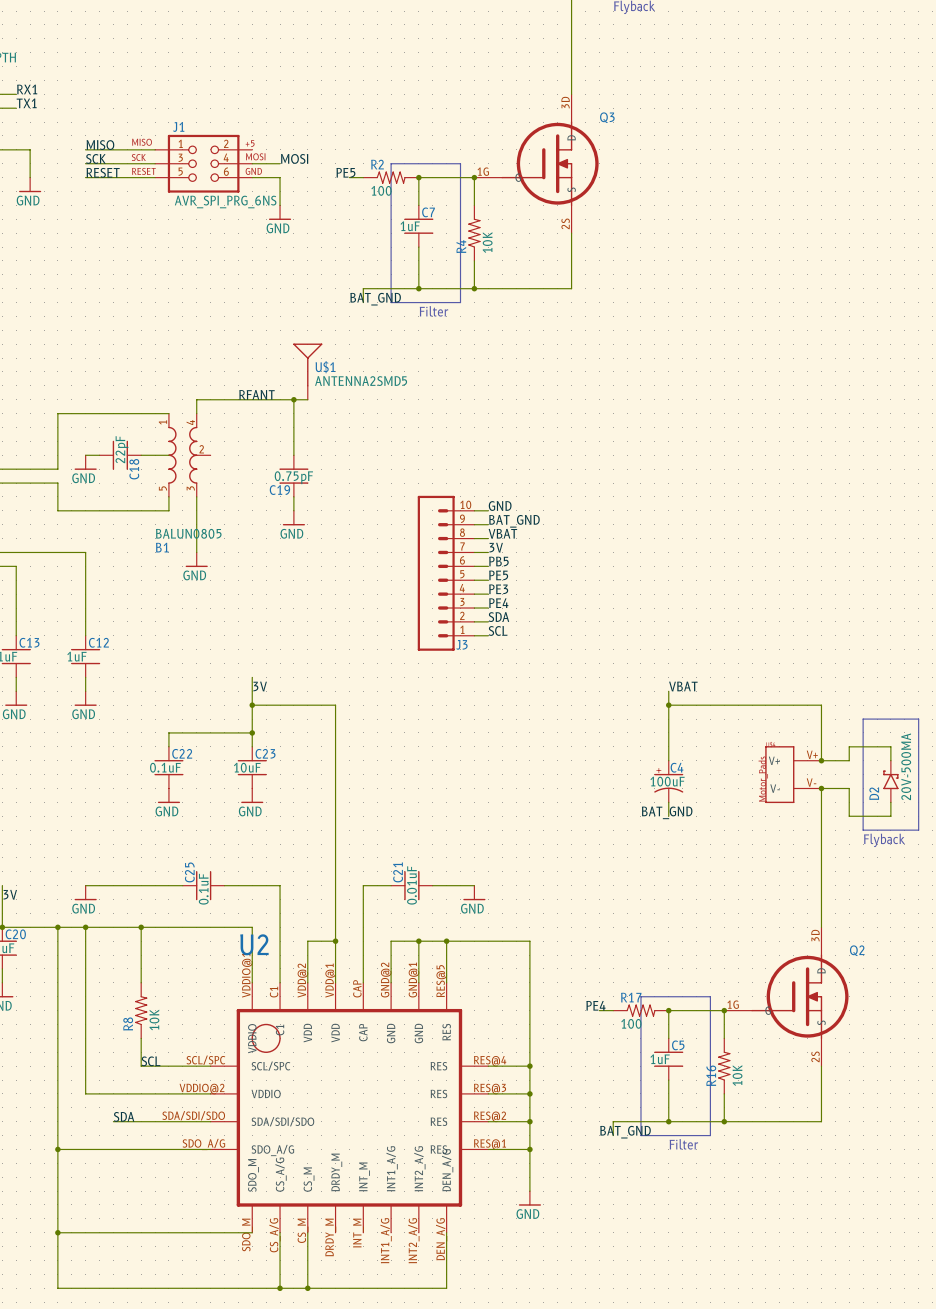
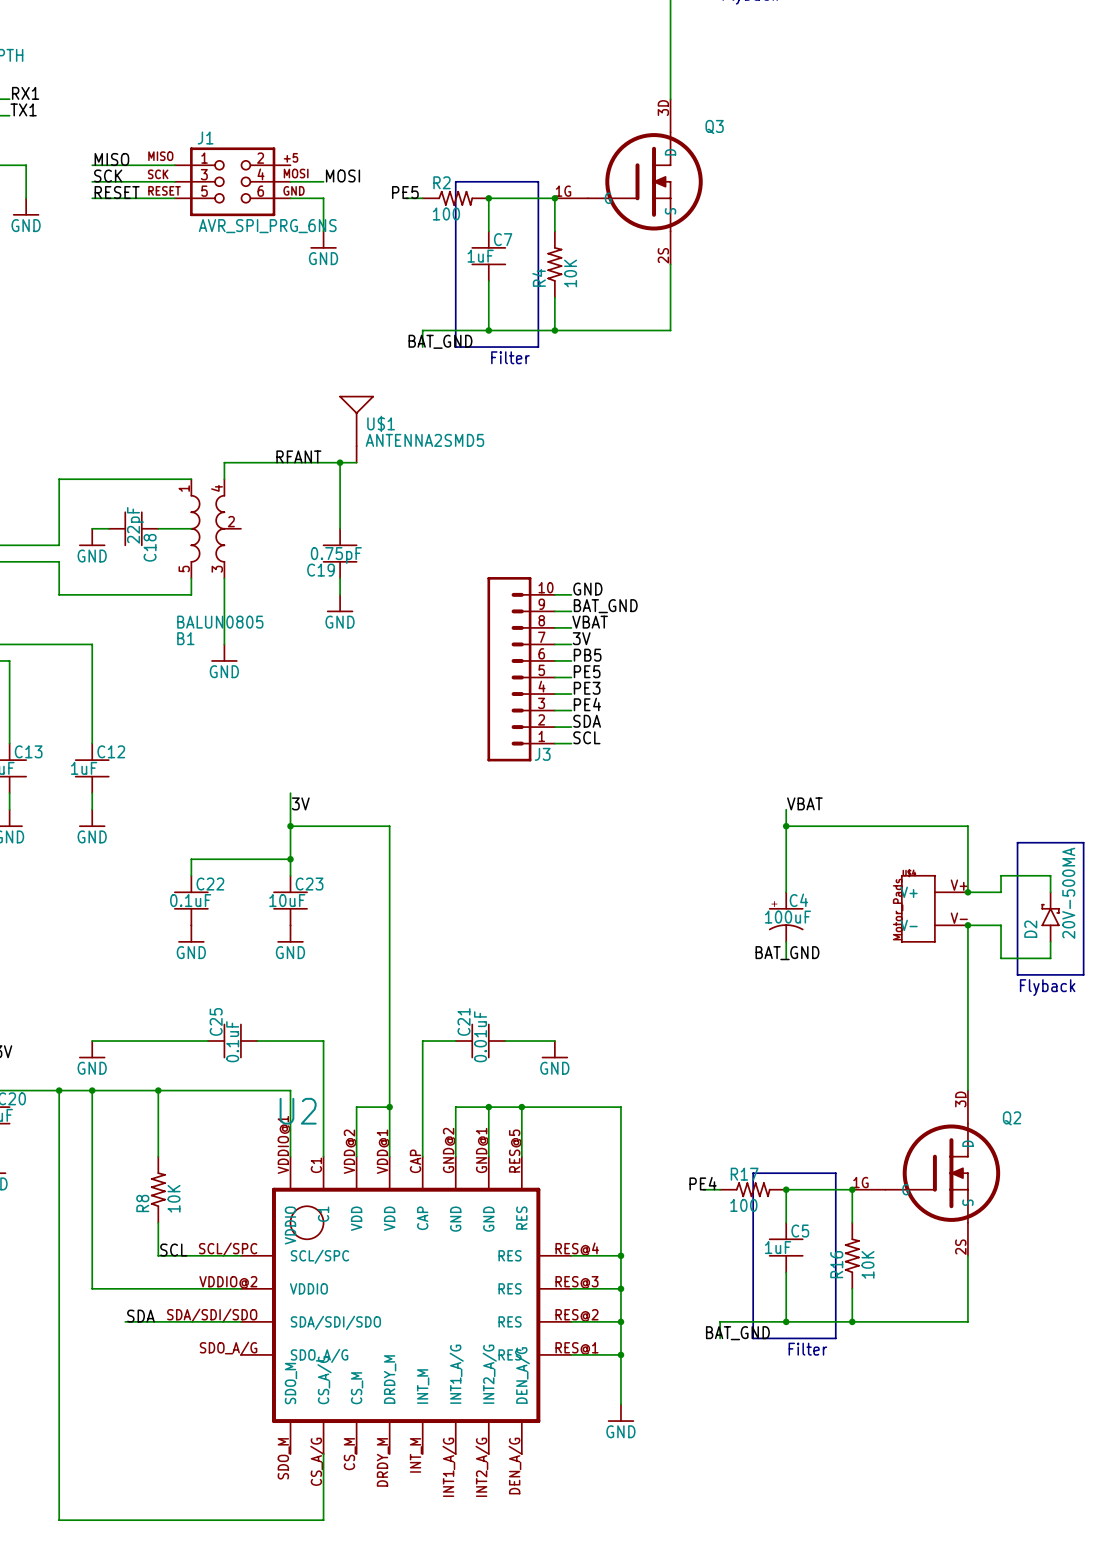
wire: (57, 1149) (210, 1149) -> none
junction: (57, 1149) -> none
wire: (57, 1232) (252, 1232) -> none
junction: (57, 1232) -> none
wire: (307, 1232) (307, 1288) -> none
wire: (446, 1232) (446, 1288) (280, 1288) -> none
junction: (280, 1288) -> none
junction: (307, 1288) -> none

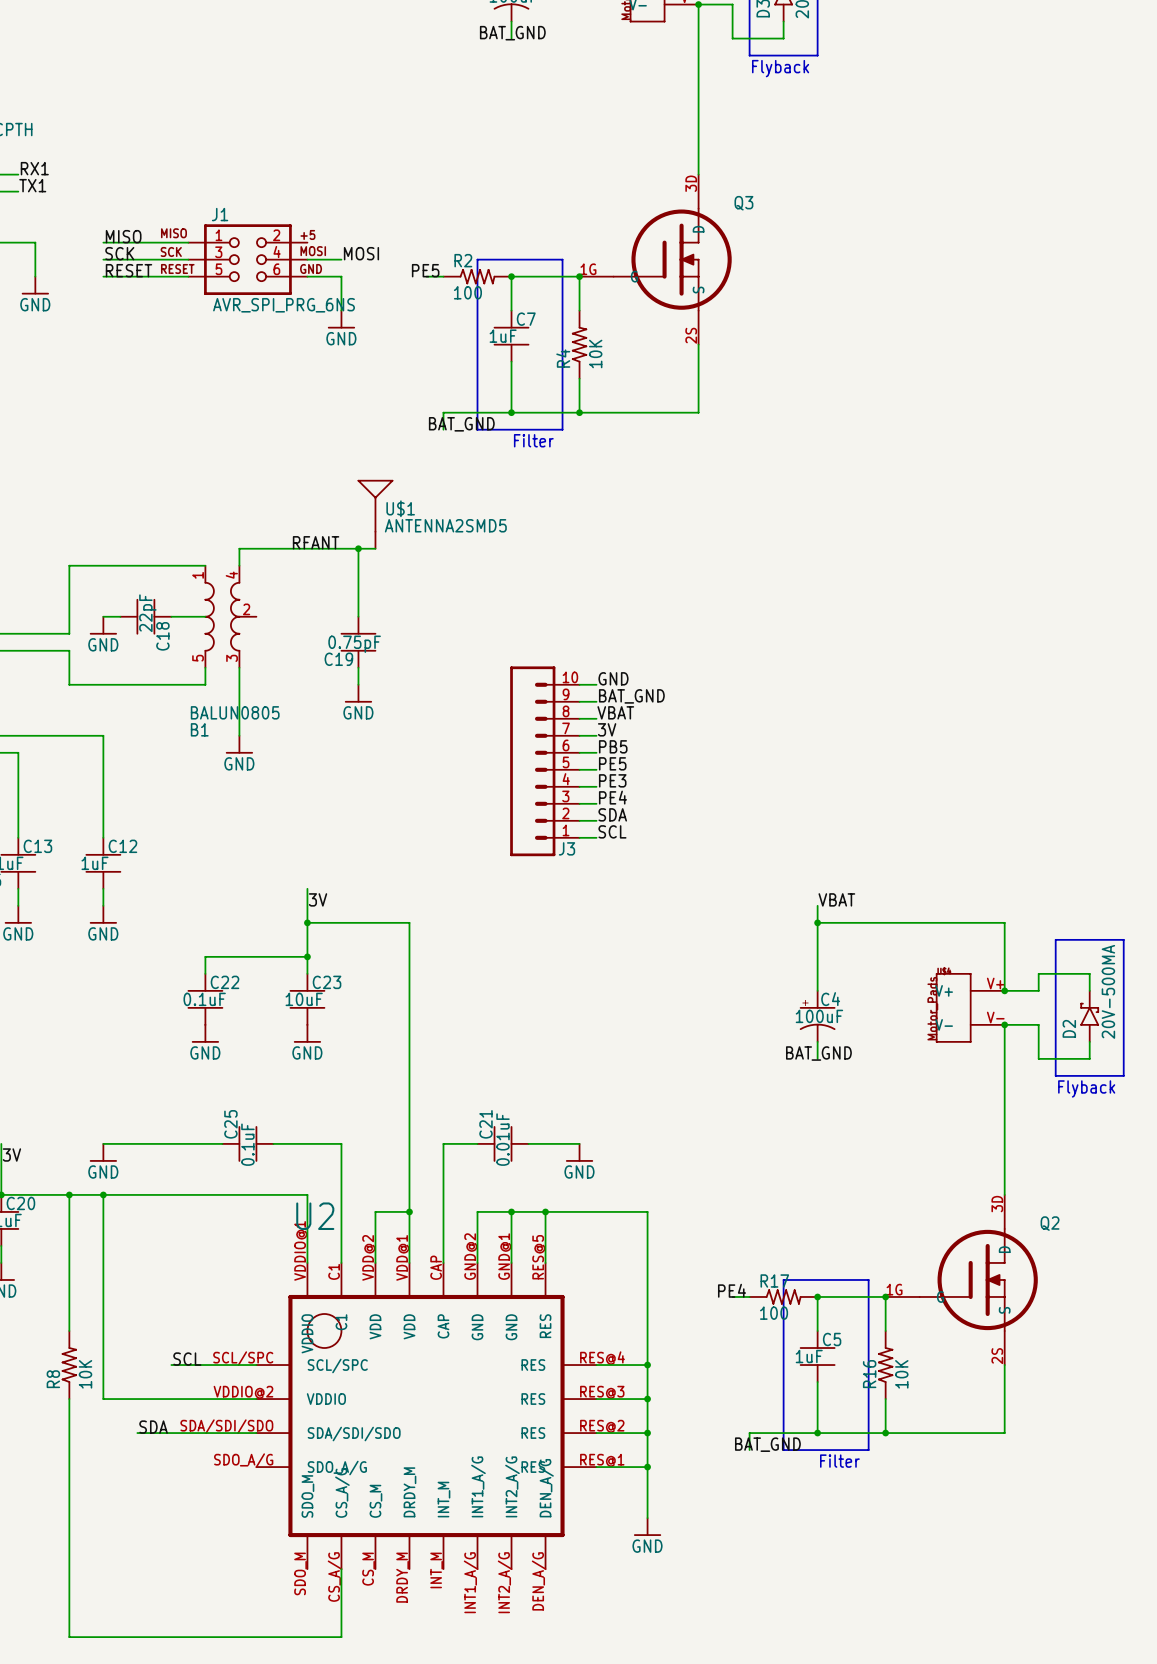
wire: (158, 1090) (158, 1156) -> none
junction: (158, 1090) -> none
R8 position: (158, 1189) -> (69, 1365)
wire: (158, 1222) (158, 1255) -> none

